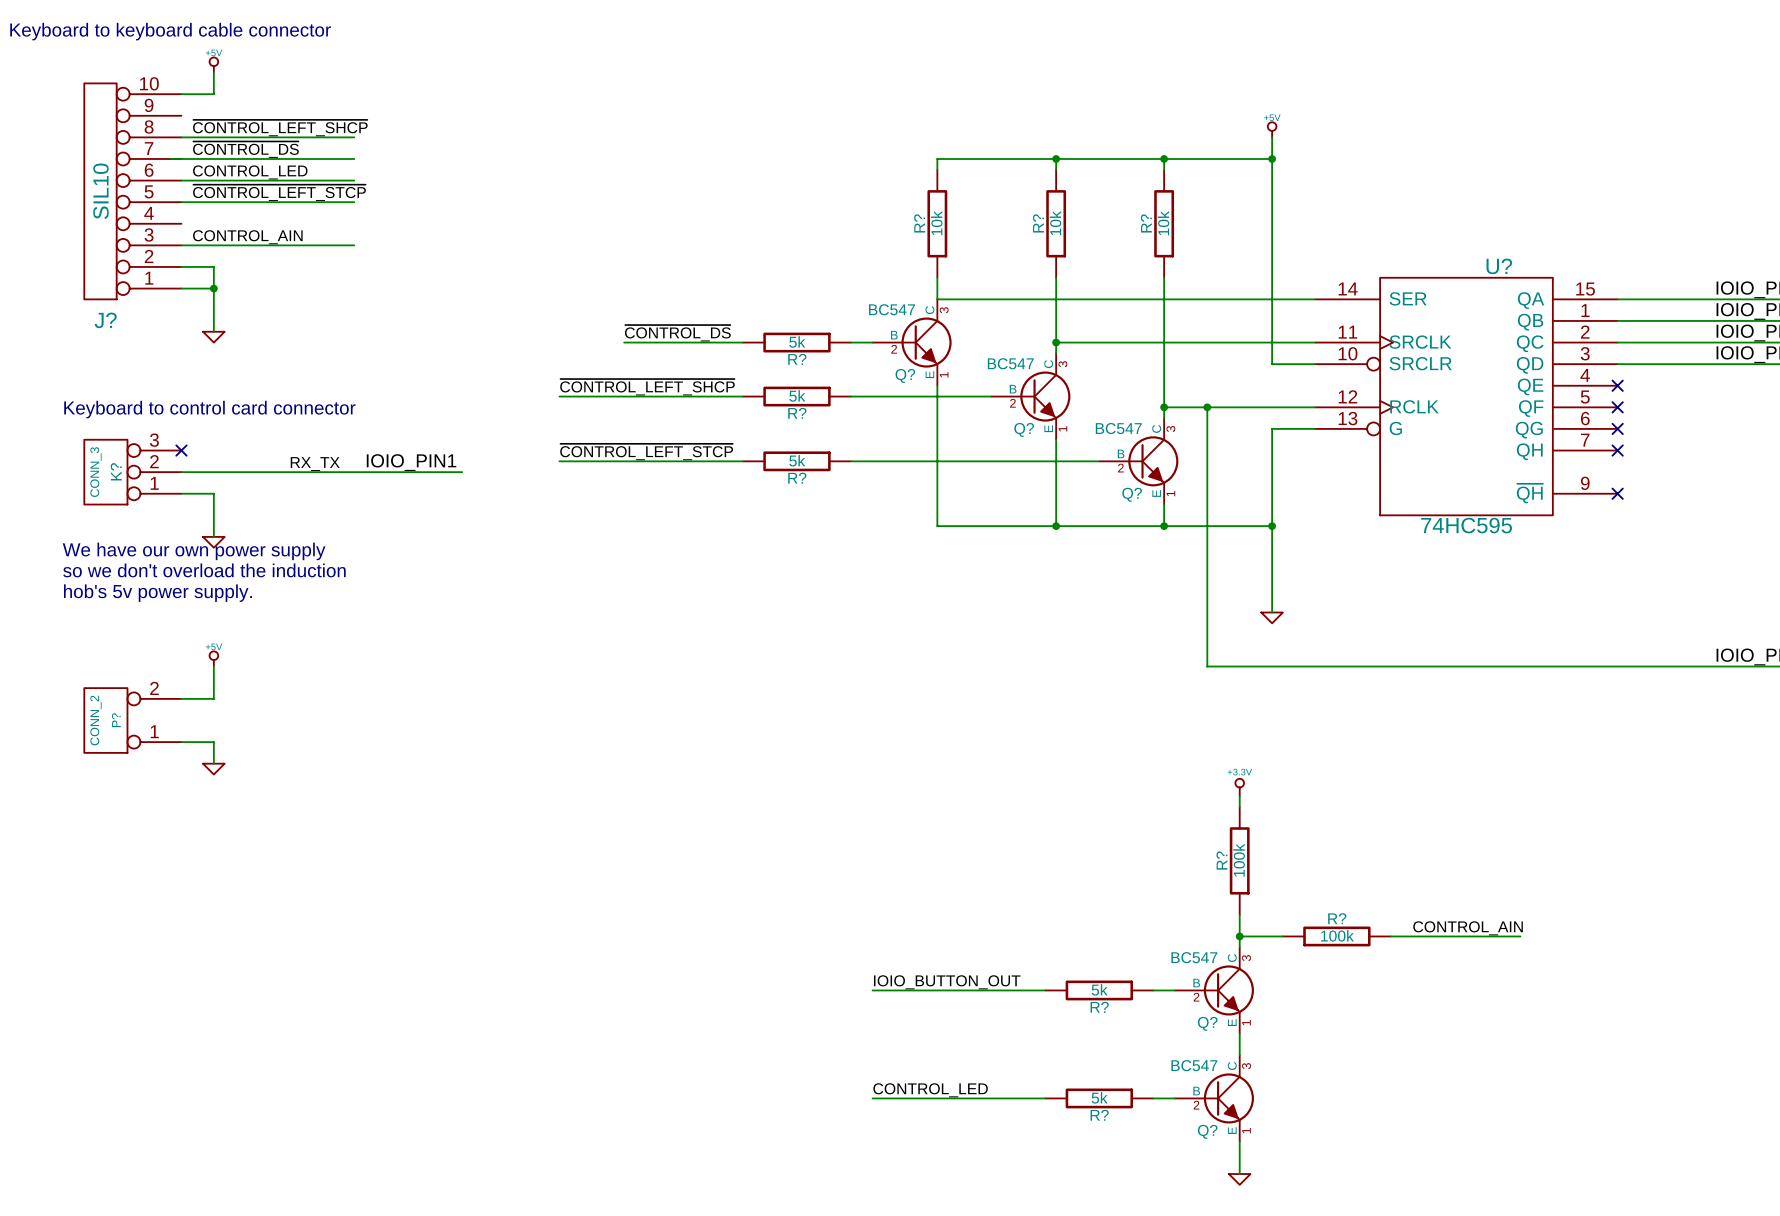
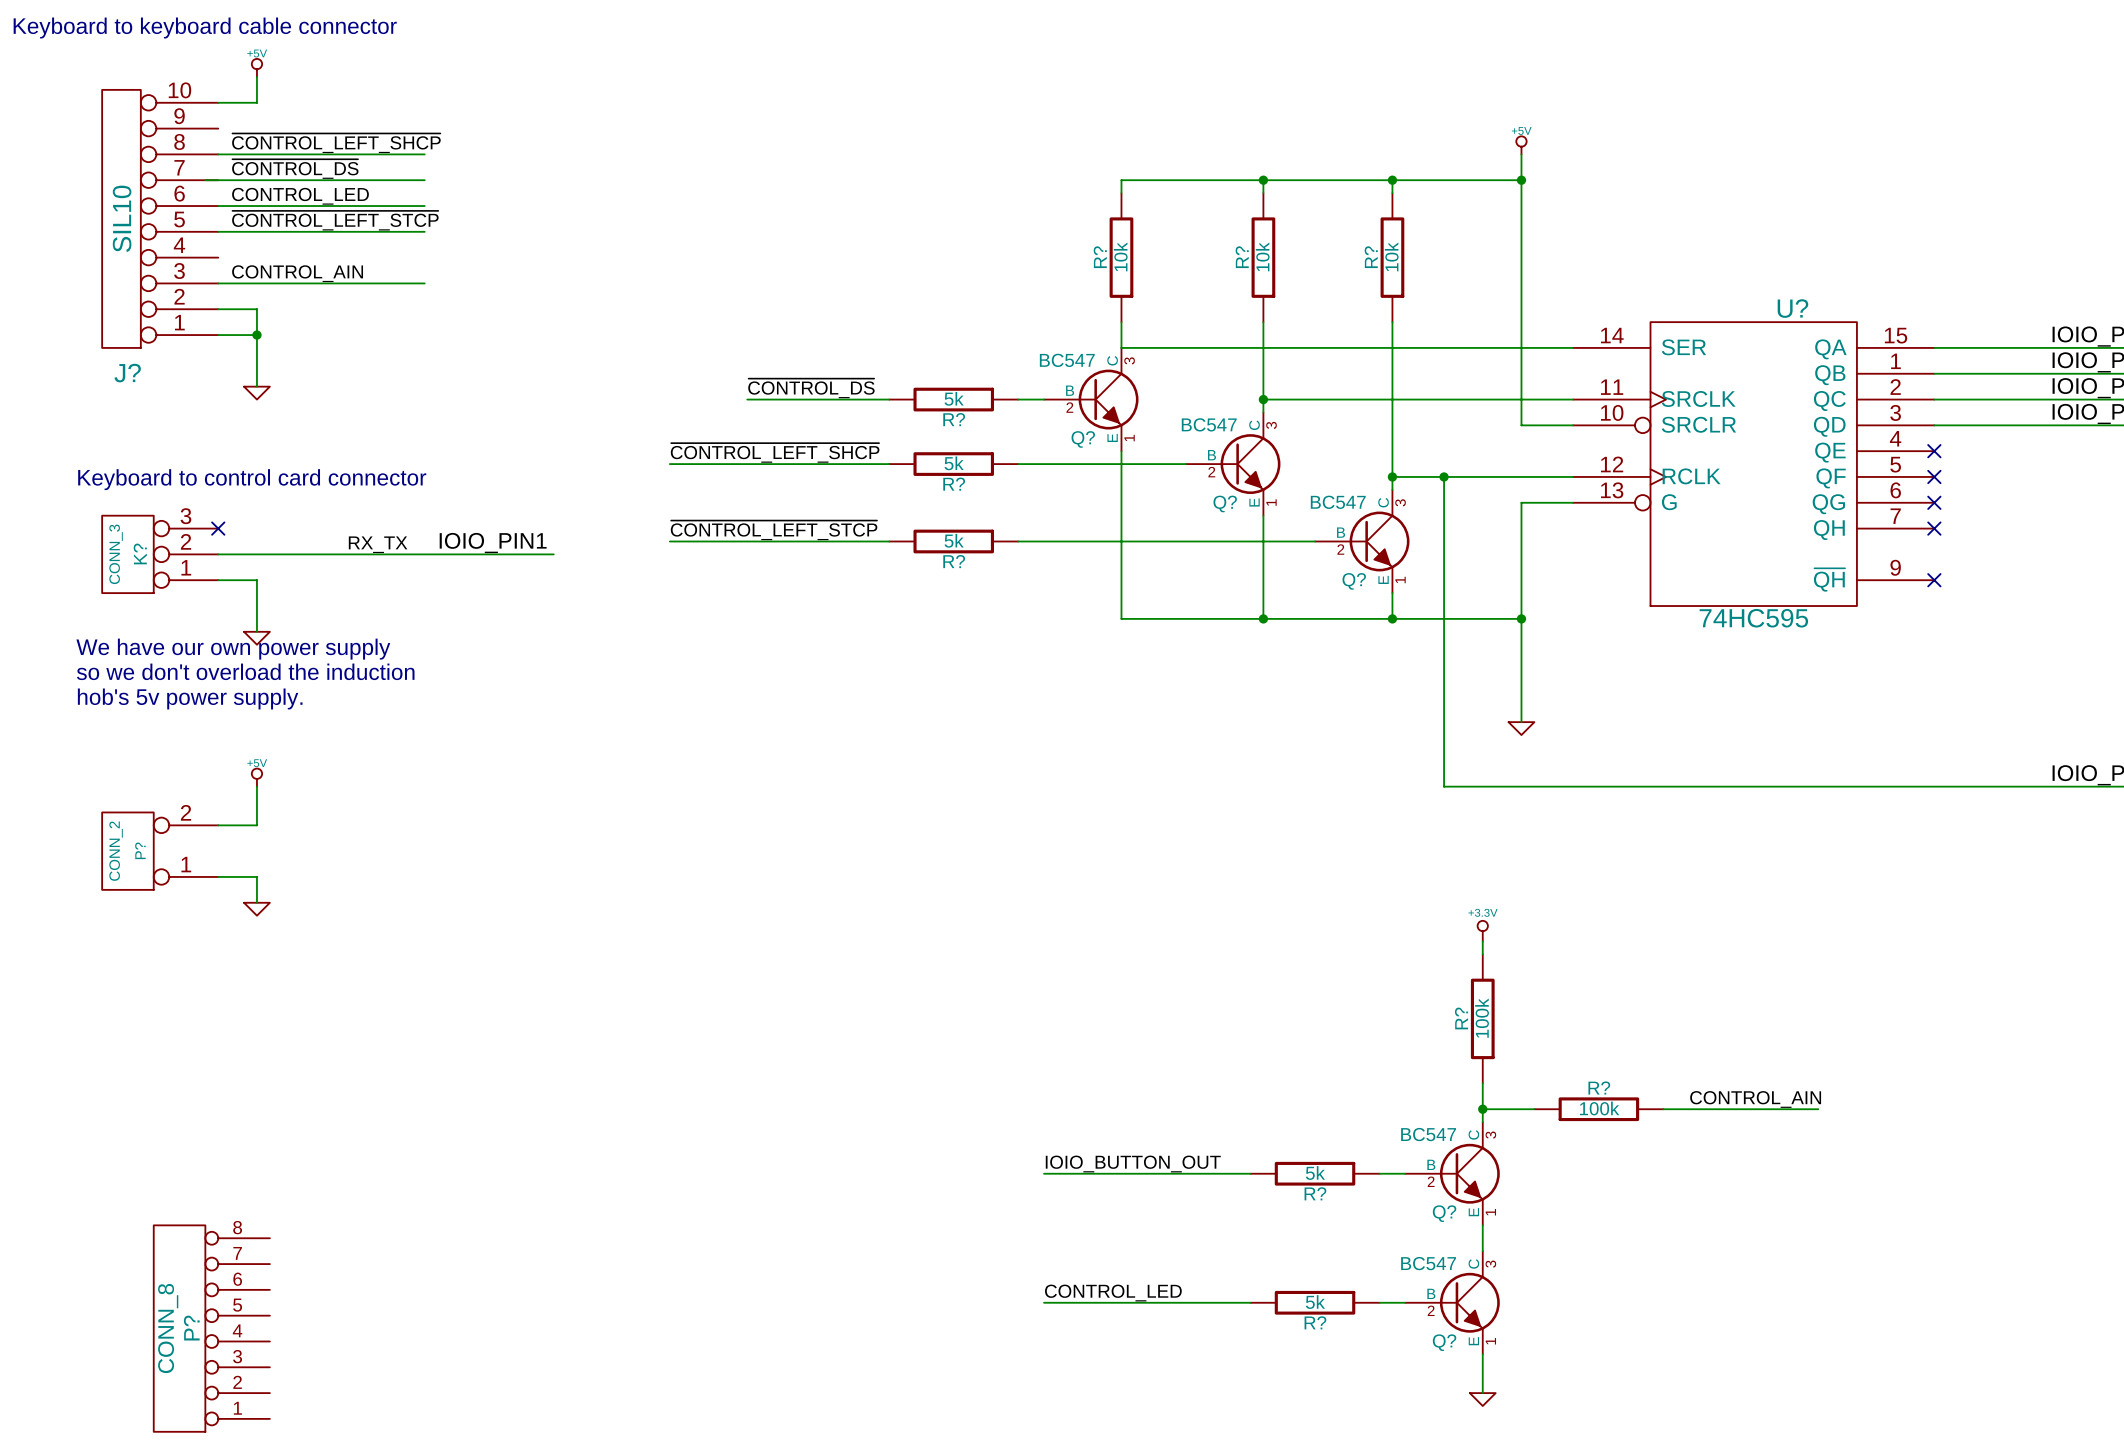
P?: none -> CONN_8 (211, 1328)

